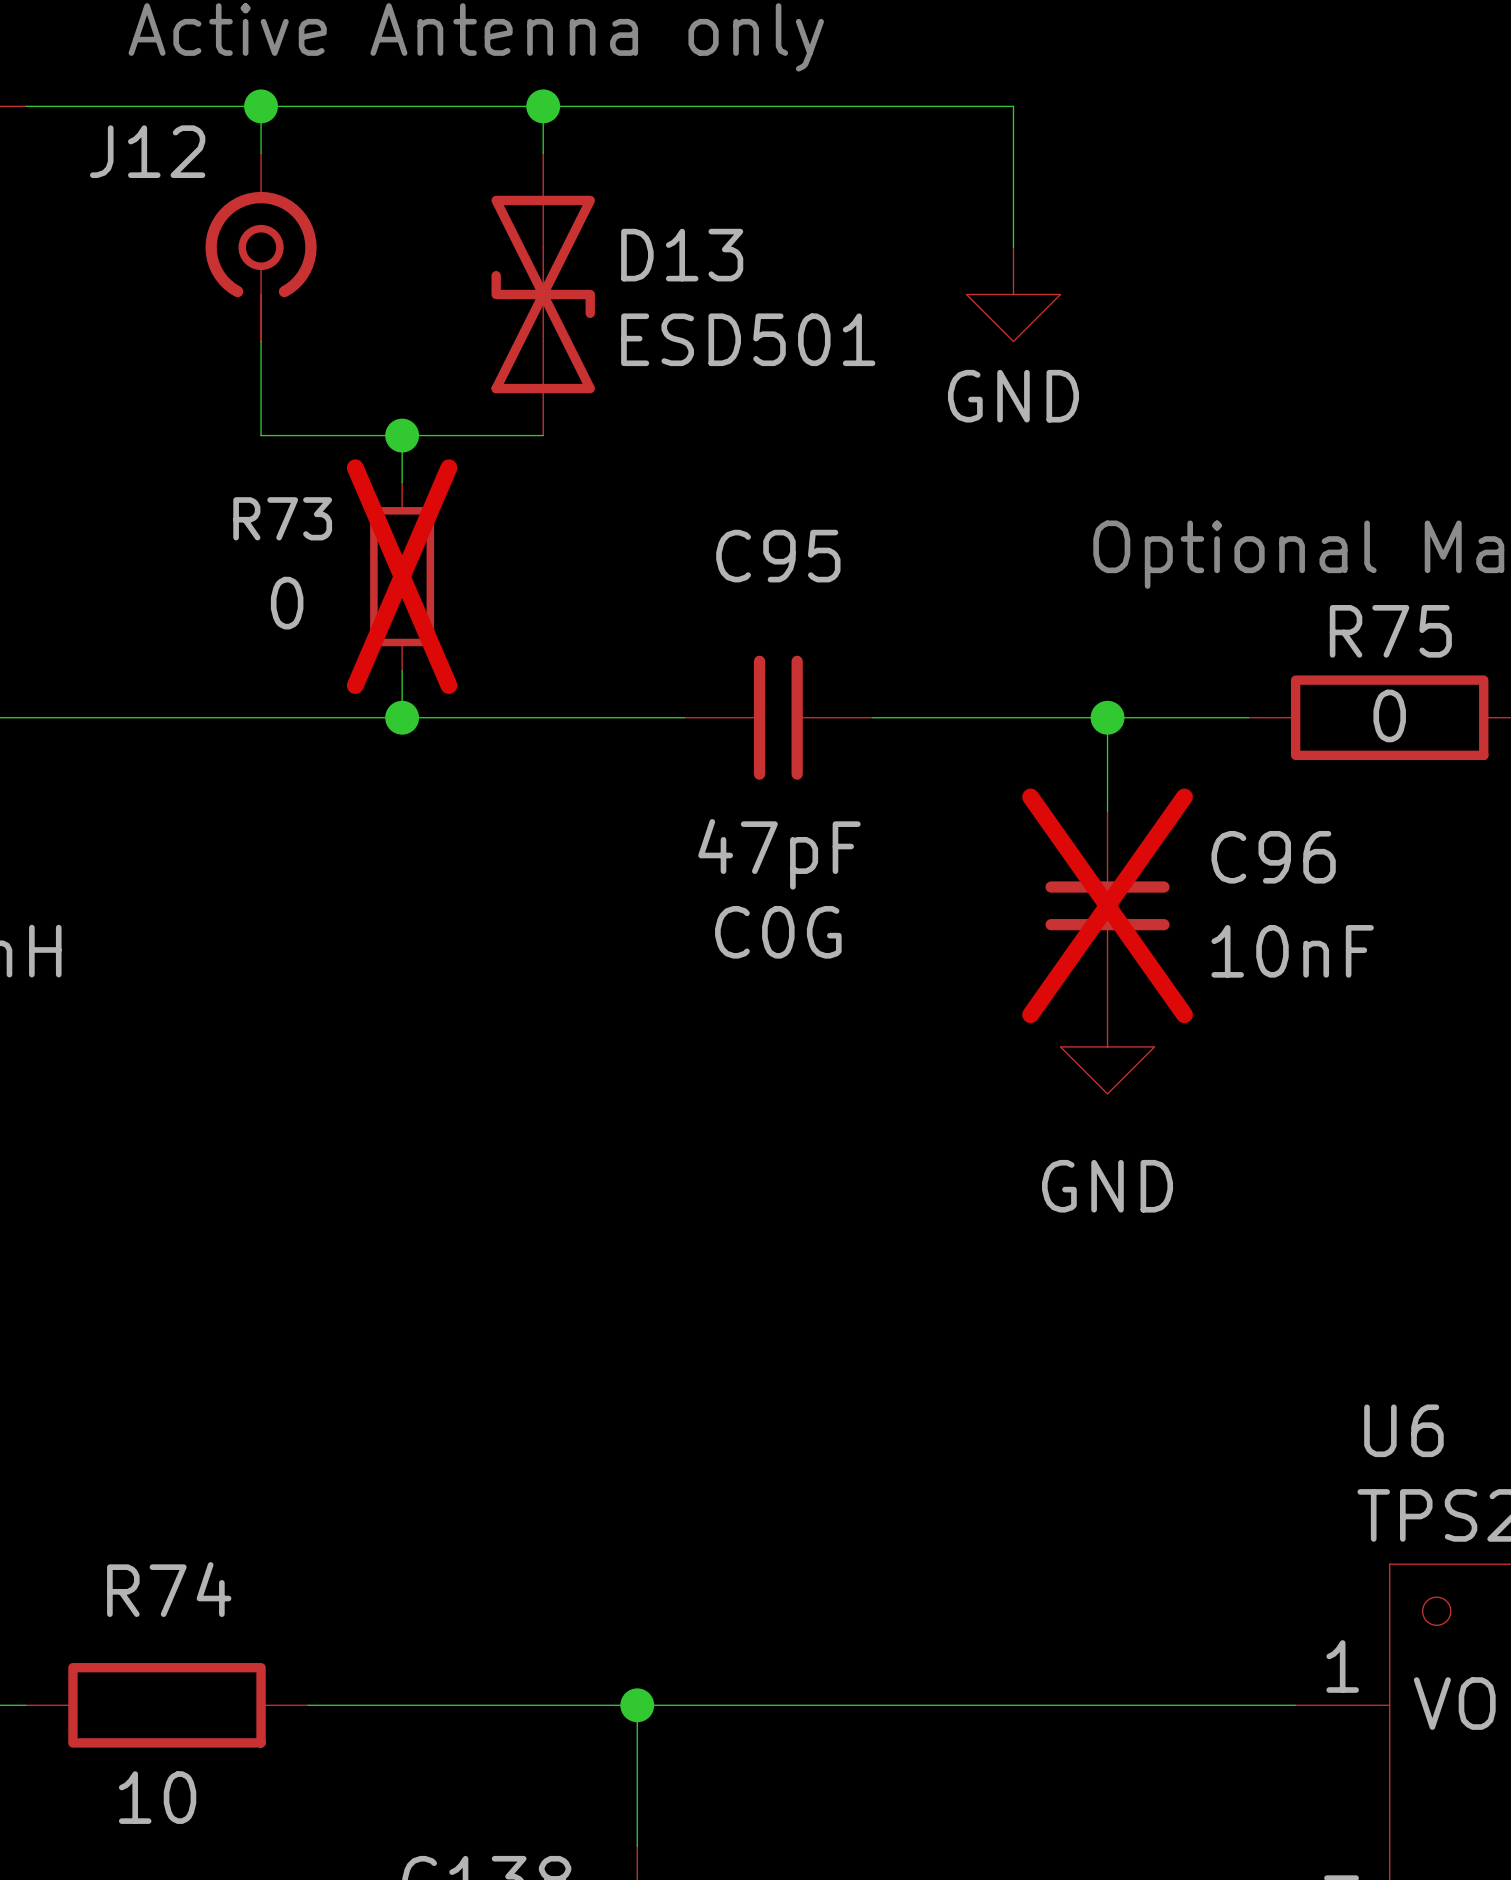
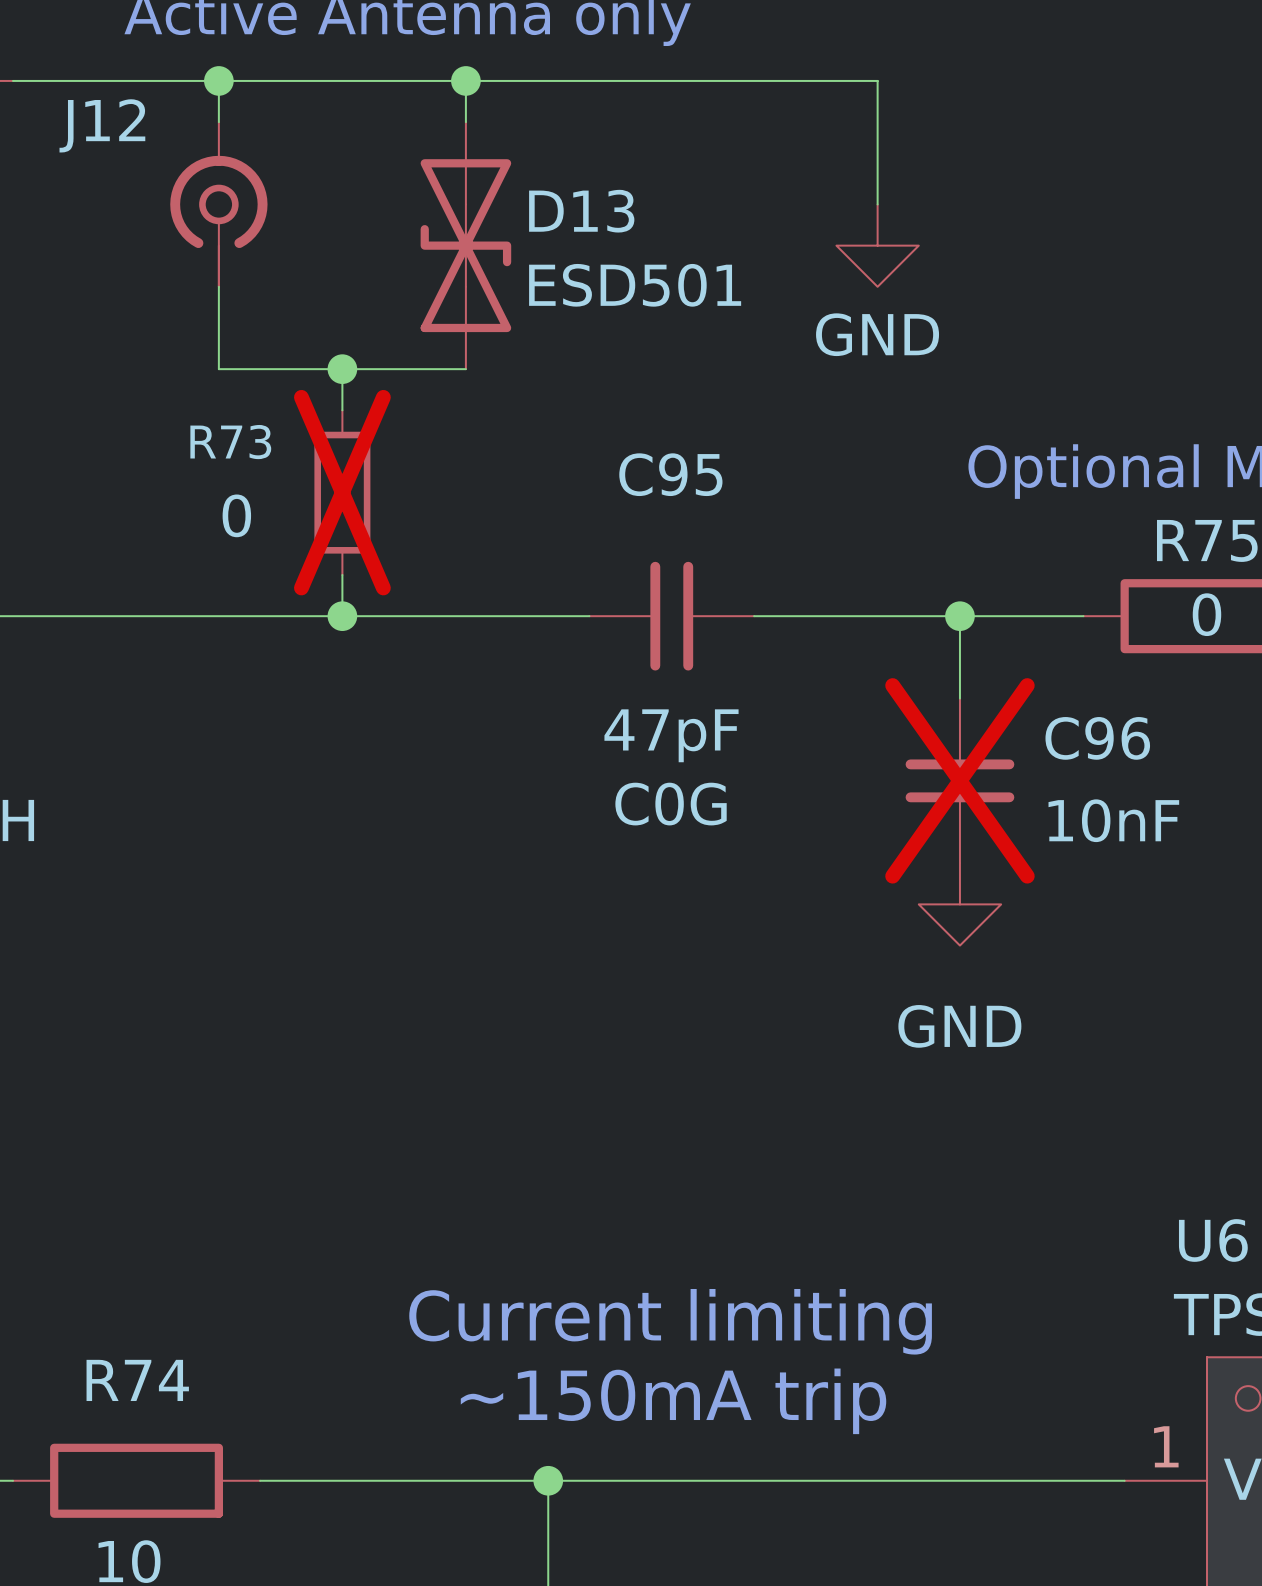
text: none -> Current limiting (670, 1321)
text: none -> ~150mA trip (673, 1401)

